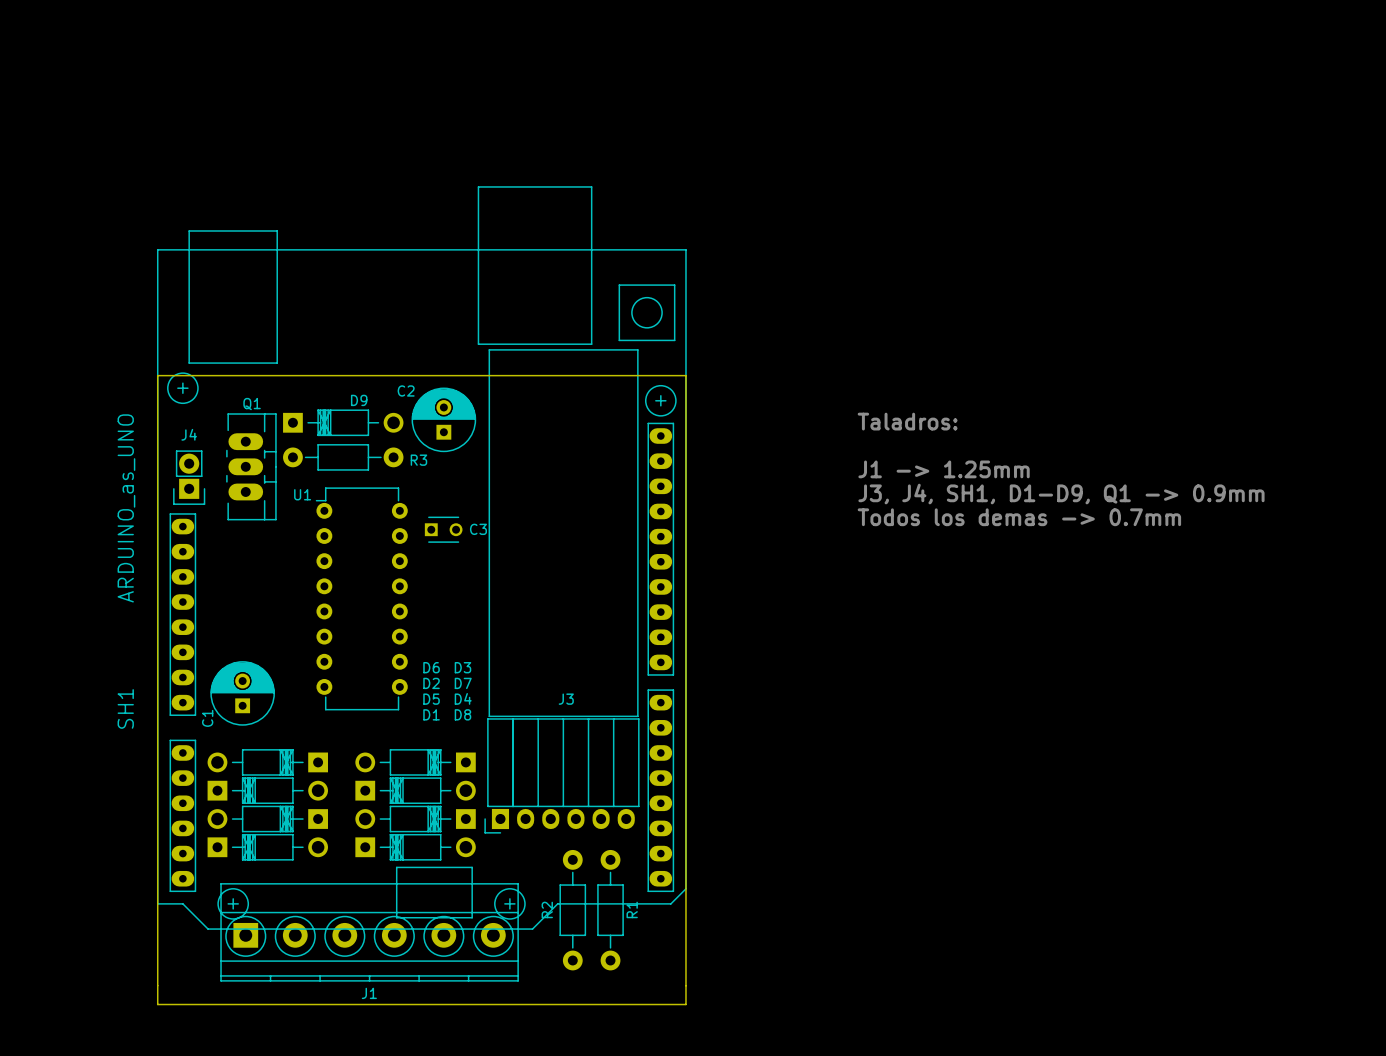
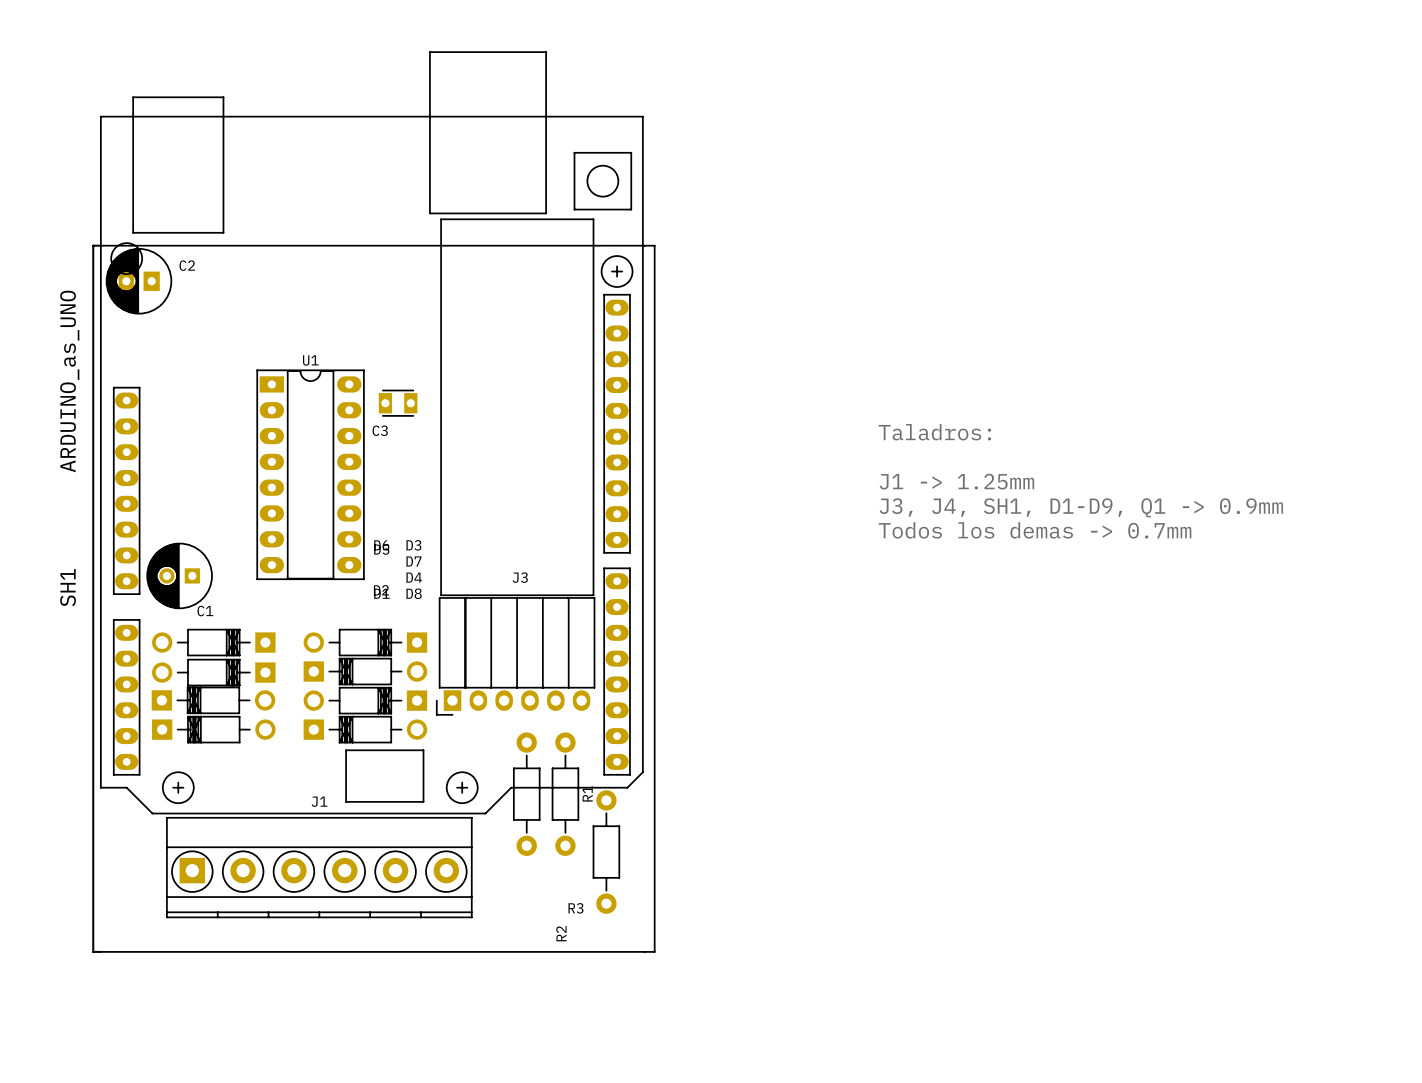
board edge: (157, 375) (157, 1004) (685, 1004) (685, 375) (157, 375) -> (93, 245) (93, 951) (654, 951) (654, 245) (93, 245)
C2 footprint: [411, 387, 477, 453] -> [105, 248, 173, 315]
C2 name position: C2 (406, 390) -> C2 (187, 265)
D9: (343, 422) -> none
R3 rotation: 0° (343, 457) -> 90° clockwise (606, 852)
R3 position: (343, 457) -> (606, 852)
R3 name position: R3 (418, 460) -> R3 (575, 908)
Q1: (251, 466) -> none
J4: (189, 477) -> none
U1 footprint: [315, 487, 408, 711] -> [256, 369, 365, 580]
U1 name position: U1 (302, 494) -> U1 (310, 360)
C3 footprint: [424, 516, 463, 543] -> [378, 389, 418, 417]
C3 name position: C3 (478, 529) -> C3 (380, 430)
SH1 position: (421, 558) -> (371, 433)
J3 position: (561, 591) -> (515, 467)
C1 rotation: 0° (242, 693) -> 90° counterclockwise (179, 575)
C1 position: (242, 693) -> (179, 575)
D6 position: (267, 762) -> (213, 642)
D3 position: (415, 762) -> (365, 642)
D7 footprint: [355, 777, 476, 804] -> [303, 657, 428, 686]
D2 position: (267, 790) -> (213, 700)
D5 position: (267, 819) -> (213, 672)
D4 position: (415, 819) -> (365, 700)
D1 position: (267, 847) -> (213, 729)
D8 position: (415, 847) -> (365, 729)
J1 footprint: [220, 883, 519, 982] -> [166, 817, 473, 919]
R2 position: (572, 910) -> (526, 794)
R1 position: (610, 910) -> (565, 794)
J1 name position: J1 (369, 993) -> J1 (319, 801)

